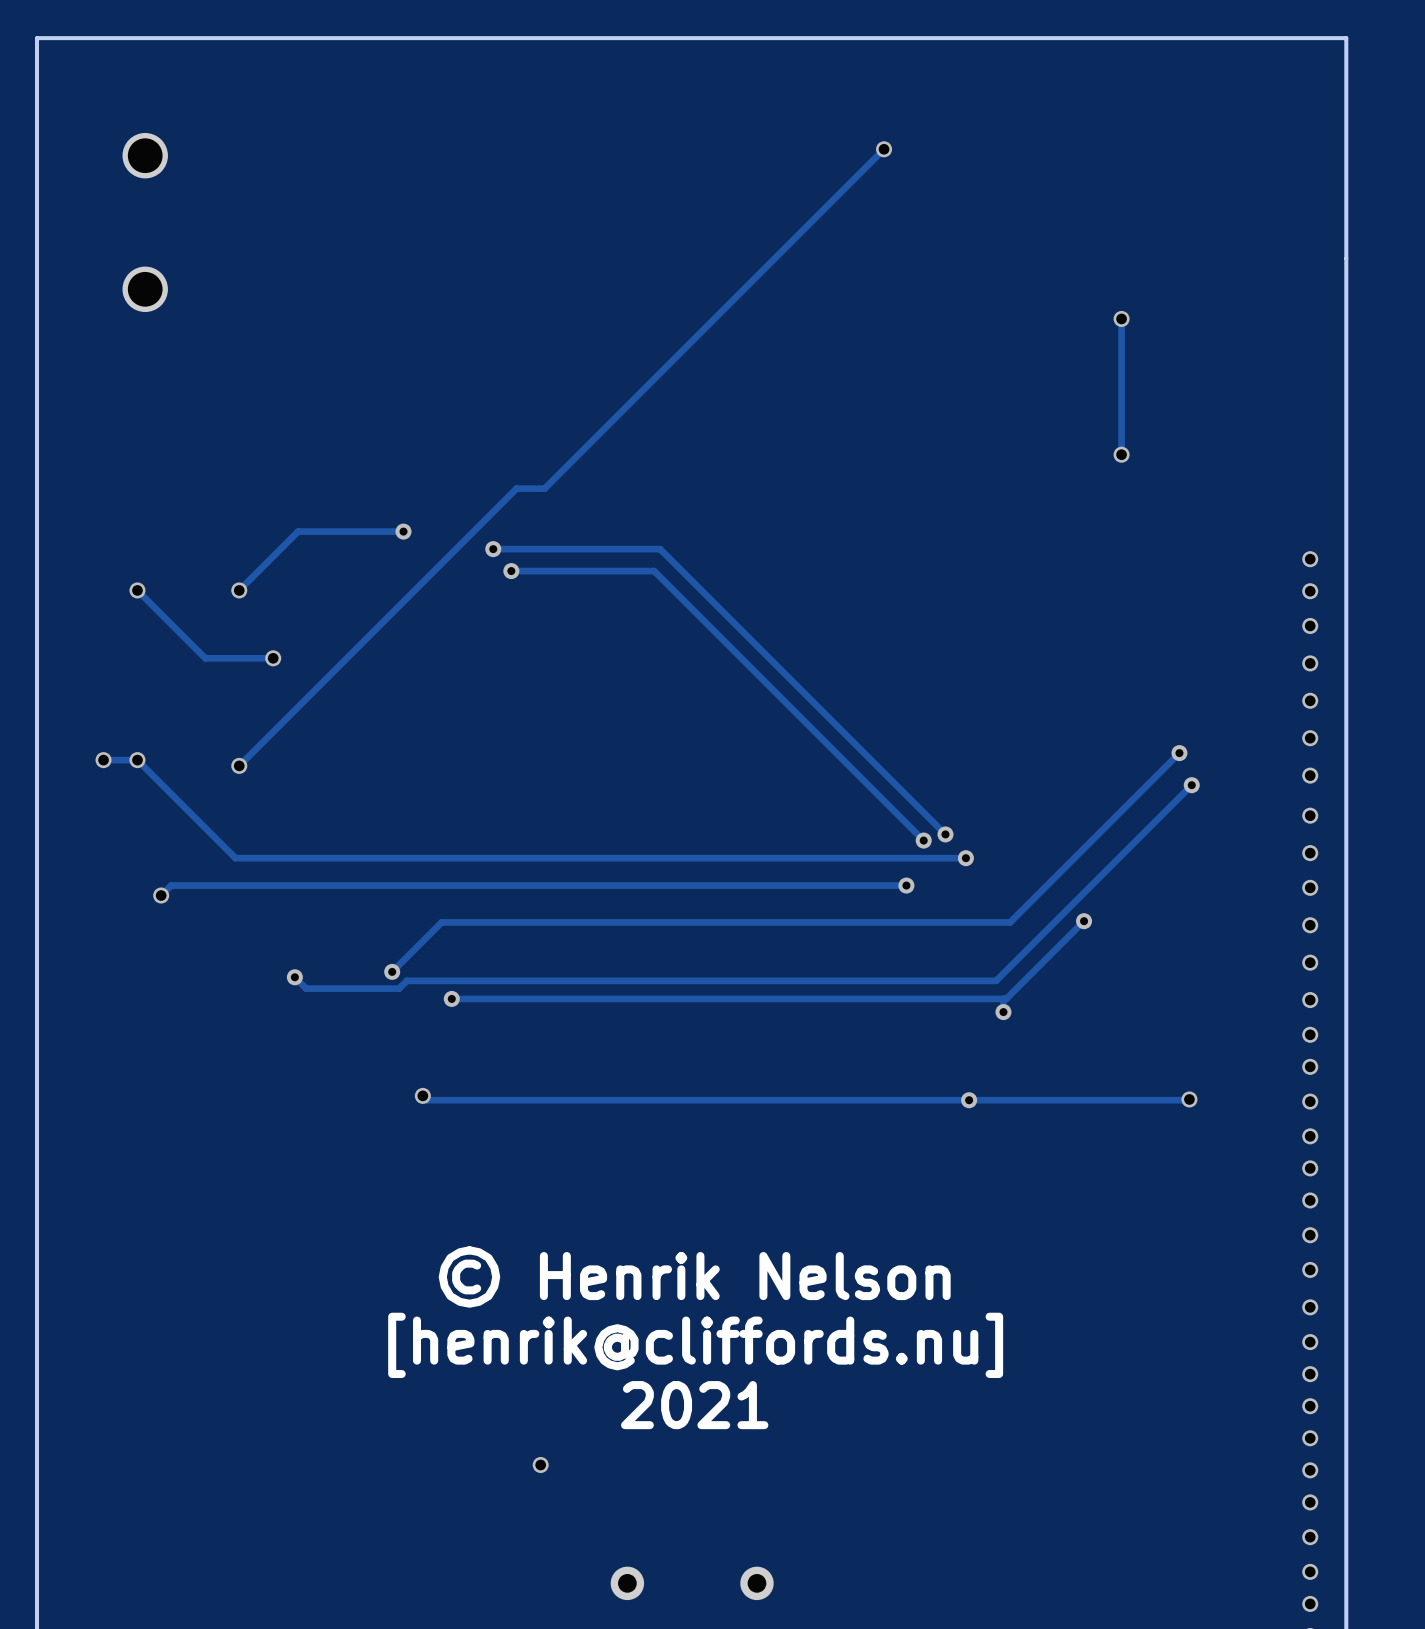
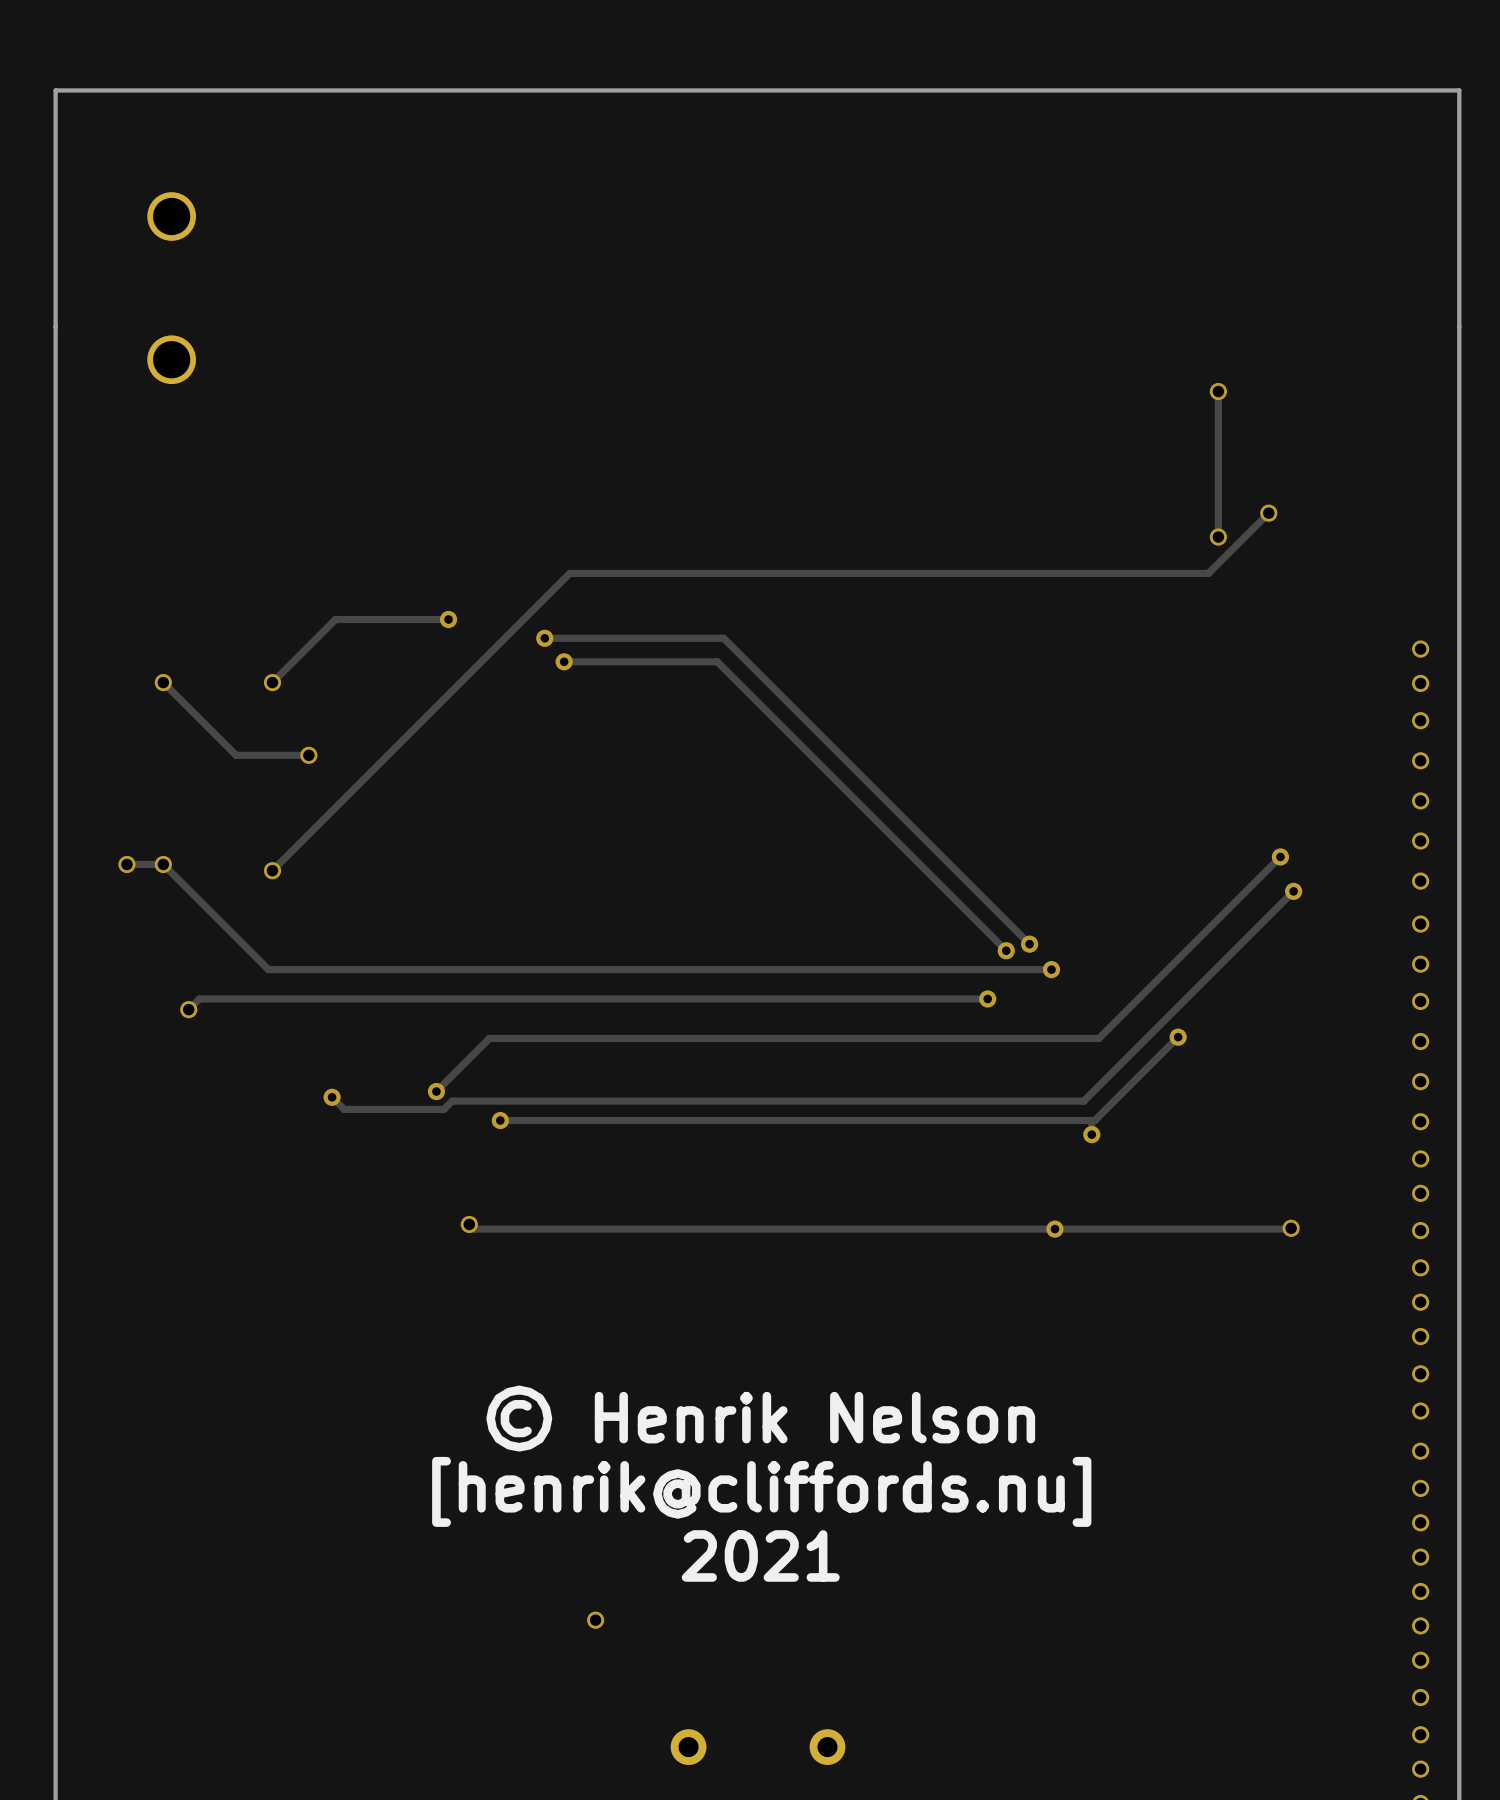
track: (884, 149) (544, 488) -> (1268, 513) (1208, 573) (599, 573)
via: (884, 149) -> none
via: none -> (1268, 513)

